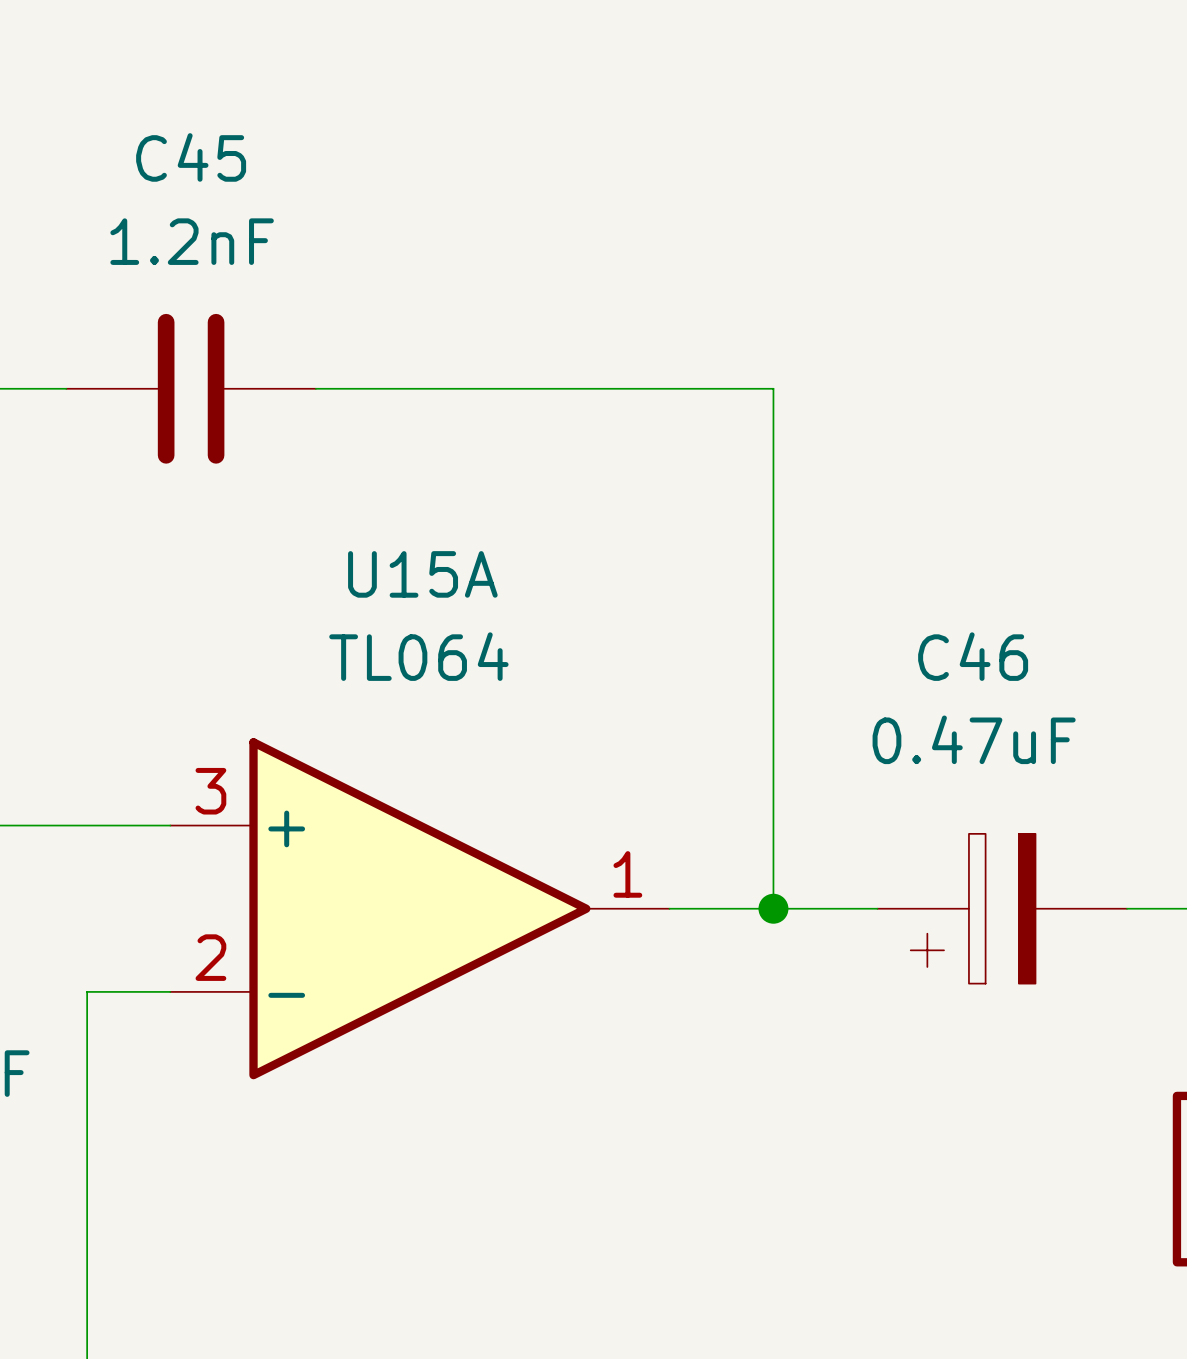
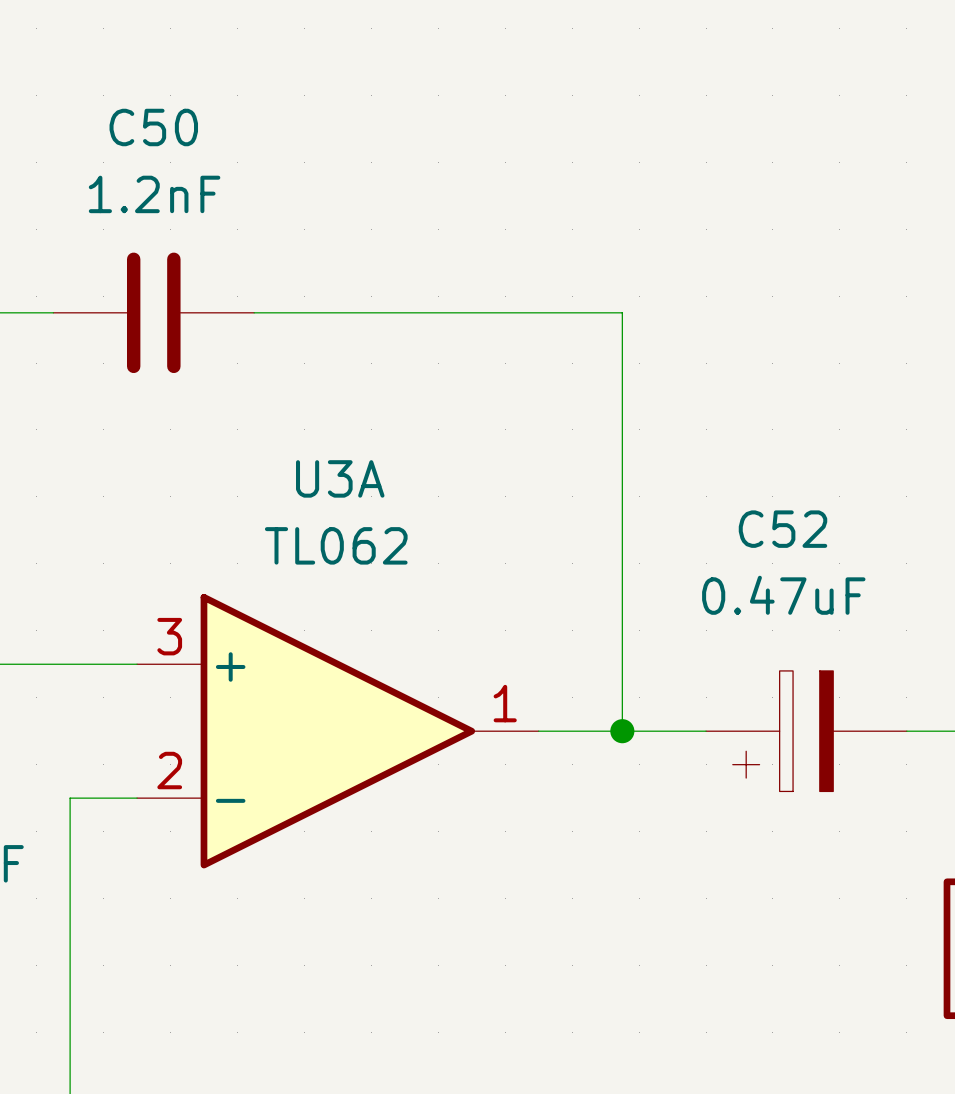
C45 name: C45 (191, 157) -> C50 (153, 127)
U15A name: U15A (422, 574) -> U3A (340, 478)
U15A value: TL064 (418, 656) -> TL062 (336, 545)
C46 name: C46 (973, 656) -> C52 (783, 529)

